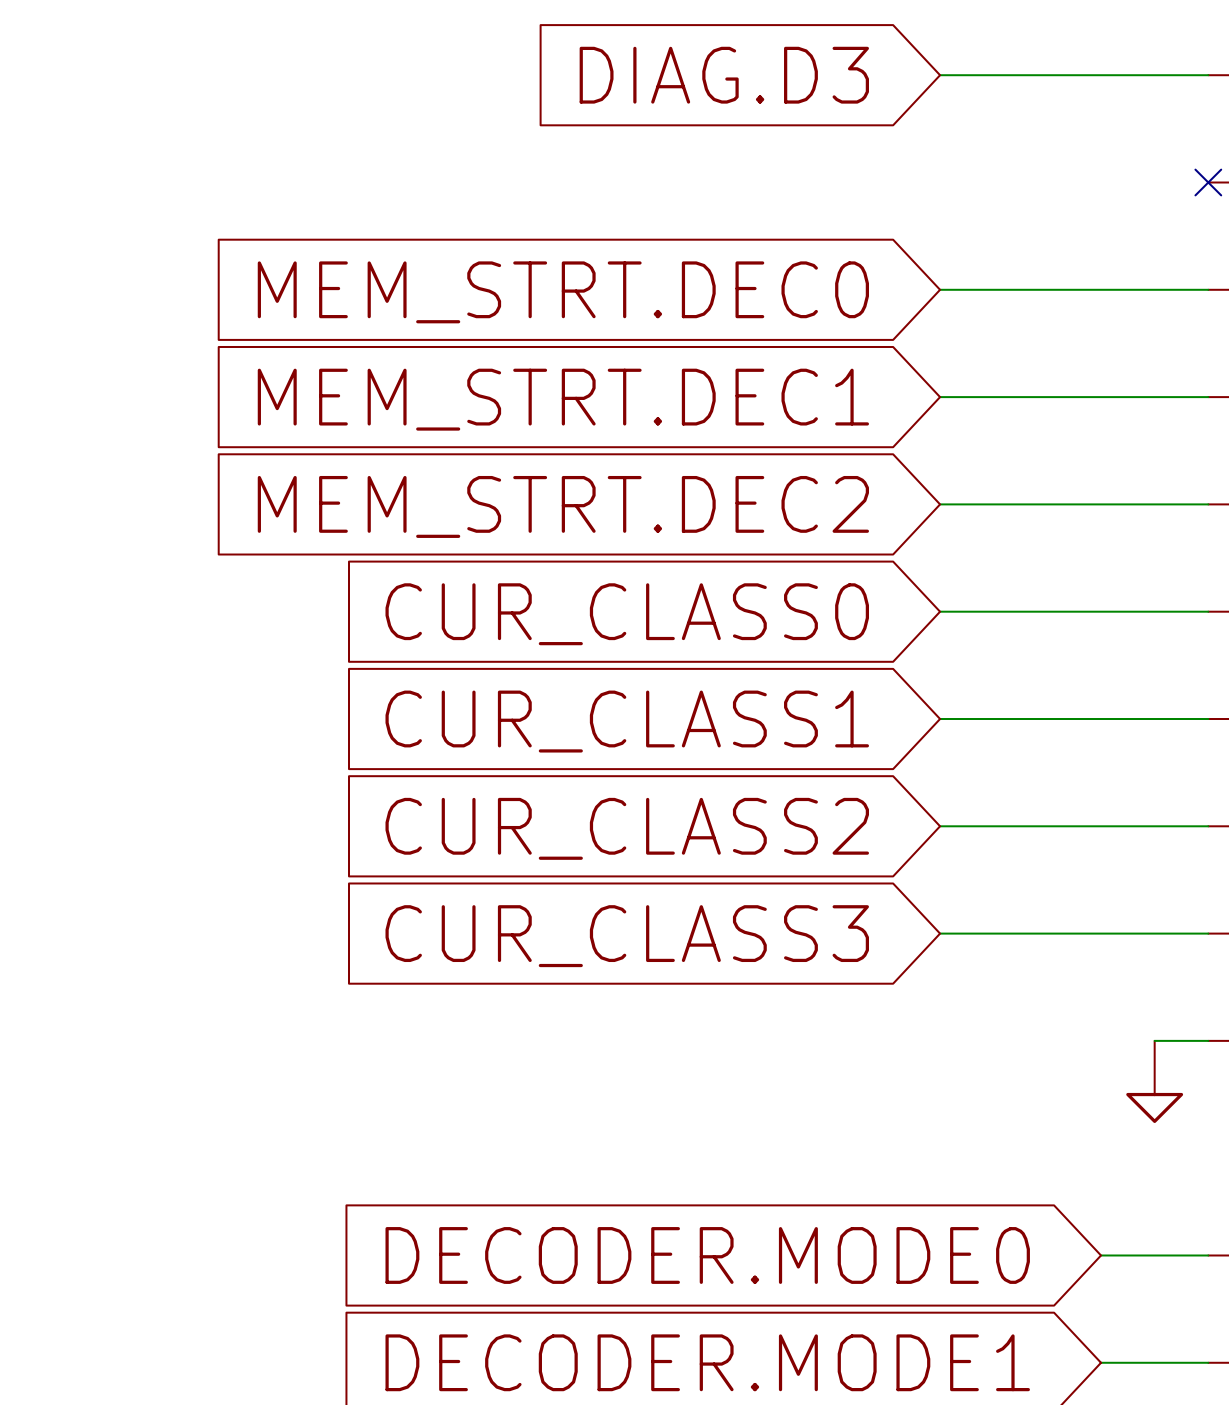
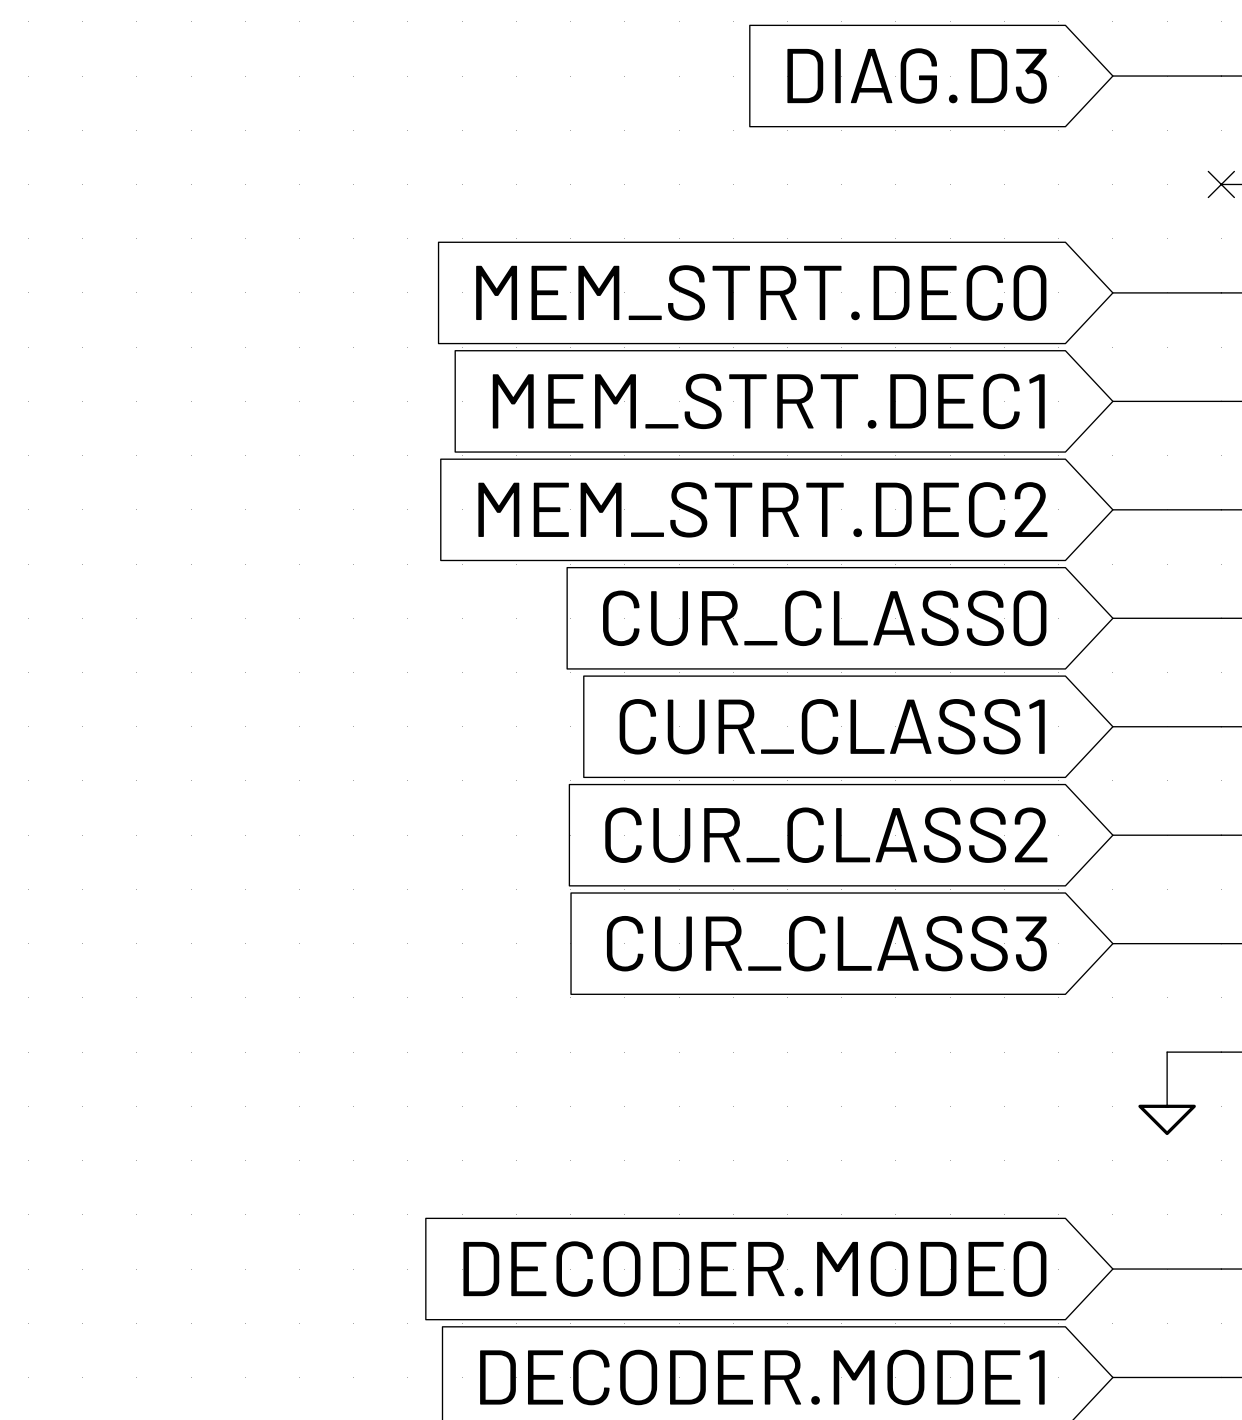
global label position: DIAG.D3 (724, 75) -> DIAG.D3 (917, 76)
wire: (940, 75) (1101, 75) -> none
wire: (940, 289) (1101, 289) -> none
global label position: MEM_STRT.DEC0 (563, 292) -> MEM_STRT.DEC0 (761, 292)
wire: (940, 397) (1101, 397) -> none
global label position: MEM_STRT.DEC1 (563, 399) -> MEM_STRT.DEC1 (768, 401)
wire: (940, 504) (1101, 504) -> none
global label position: MEM_STRT.DEC2 (563, 506) -> MEM_STRT.DEC2 (762, 509)
wire: (940, 611) (1101, 611) -> none
global label position: CUR_CLASS0 (627, 614) -> CUR_CLASS0 (824, 618)
wire: (940, 718) (1101, 718) -> none
global label position: CUR_CLASS1 (627, 721) -> CUR_CLASS1 (832, 726)
wire: (940, 826) (1101, 826) -> none
global label position: CUR_CLASS2 (627, 828) -> CUR_CLASS2 (826, 835)
wire: (940, 933) (1101, 933) -> none
global label position: CUR_CLASS3 (627, 936) -> CUR_CLASS3 (826, 943)

